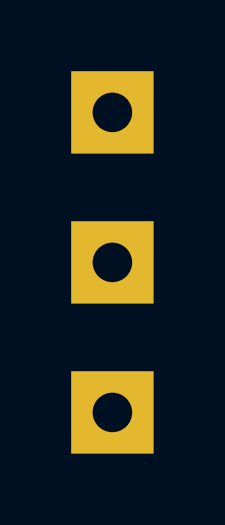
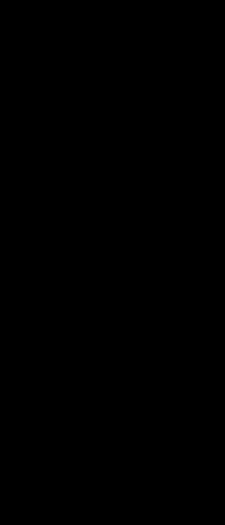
part: (112, 112) -> none
part: (112, 262) -> none
part: (112, 412) -> none

